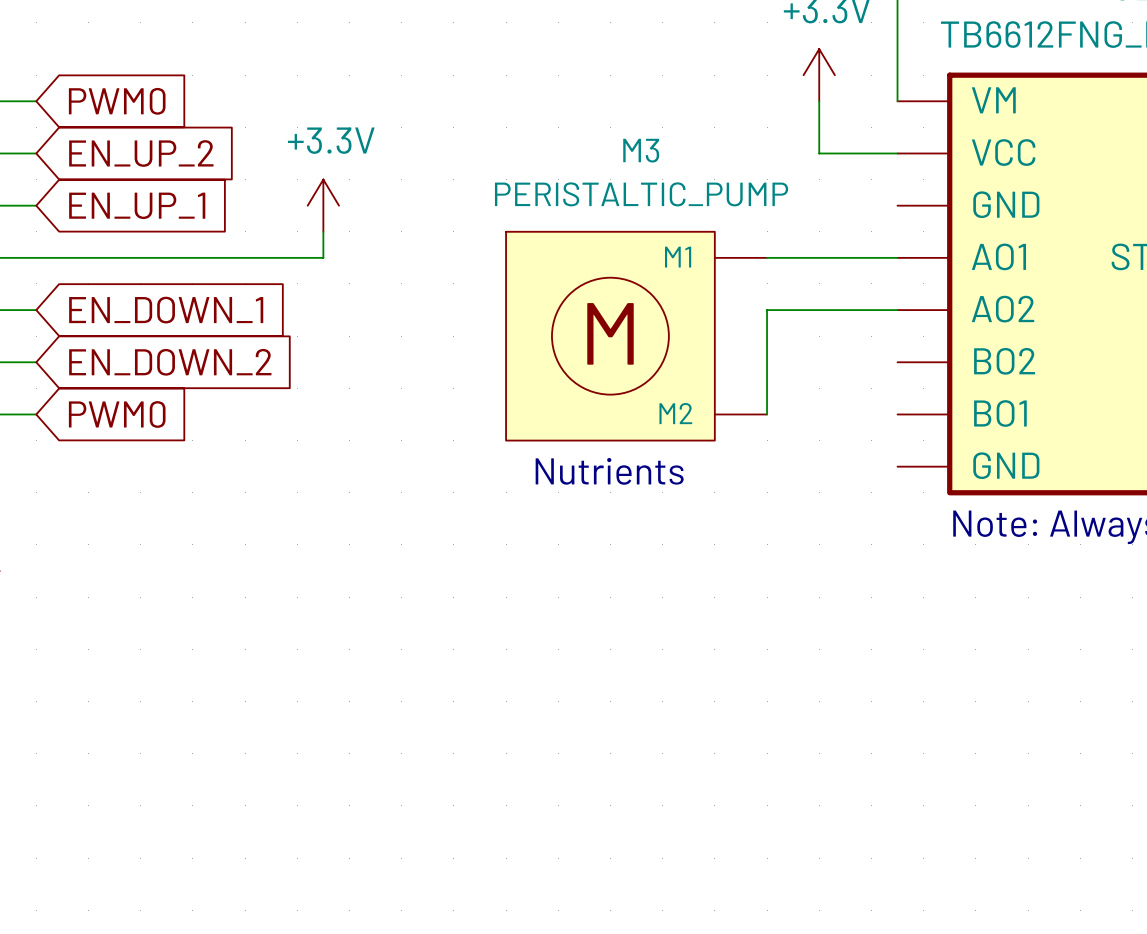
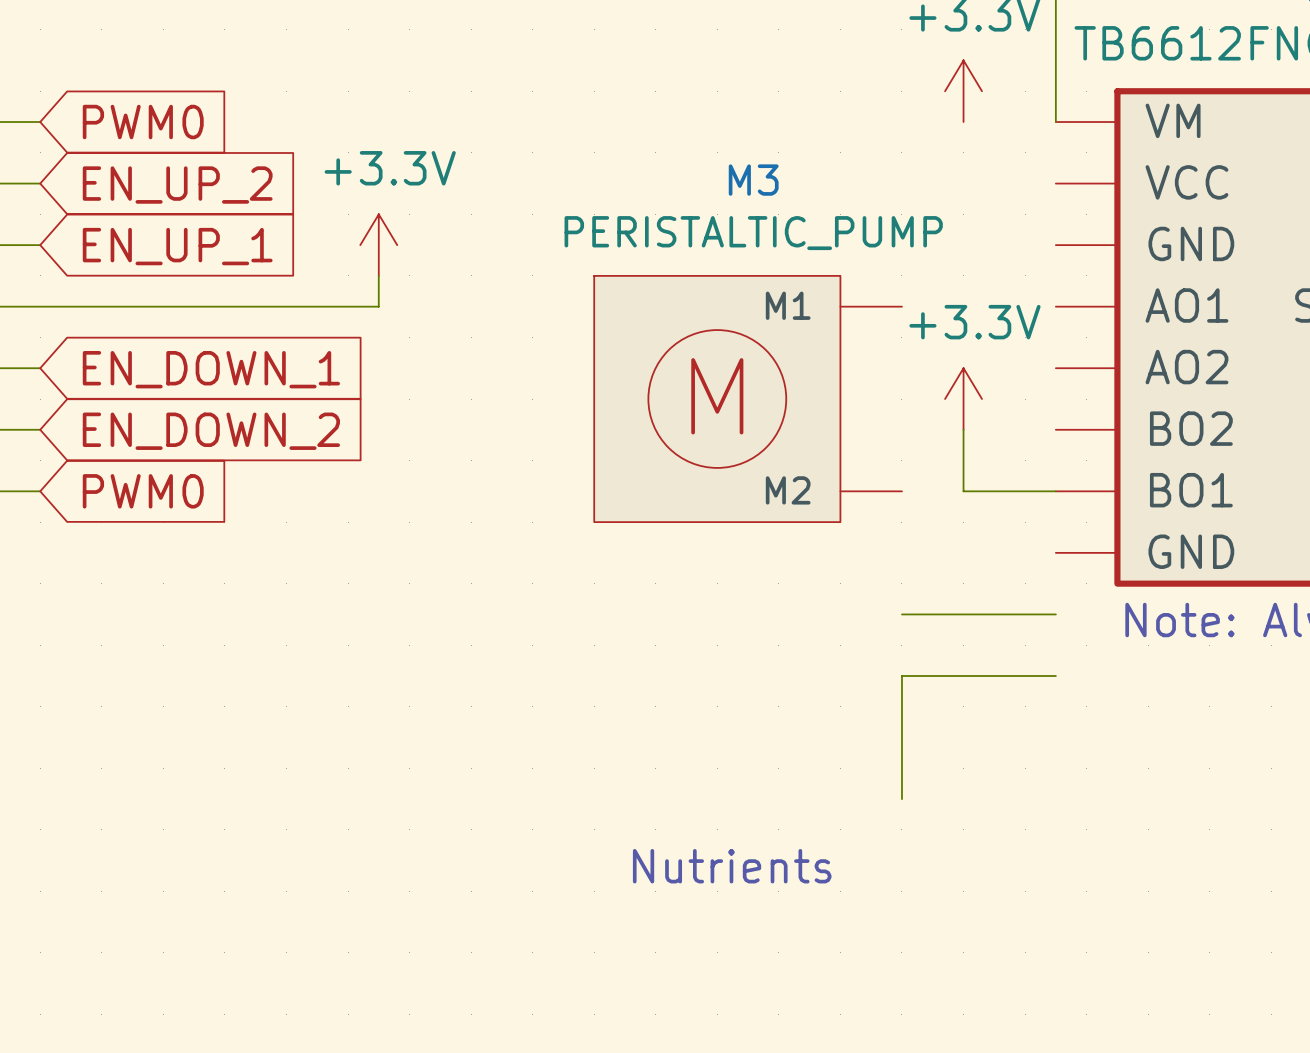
wire: (819, 101) (819, 153) (897, 153) -> (963, 429) (963, 491) (1055, 491)
wire: (767, 257) (897, 257) -> (901, 614) (1055, 614)
wire: (897, 310) (767, 310) (767, 414) -> (1055, 675) (901, 675) (901, 799)
power symbol: none -> +3.3V (963, 399)
text position: Nutrients (609, 471) -> Nutrients (732, 866)

